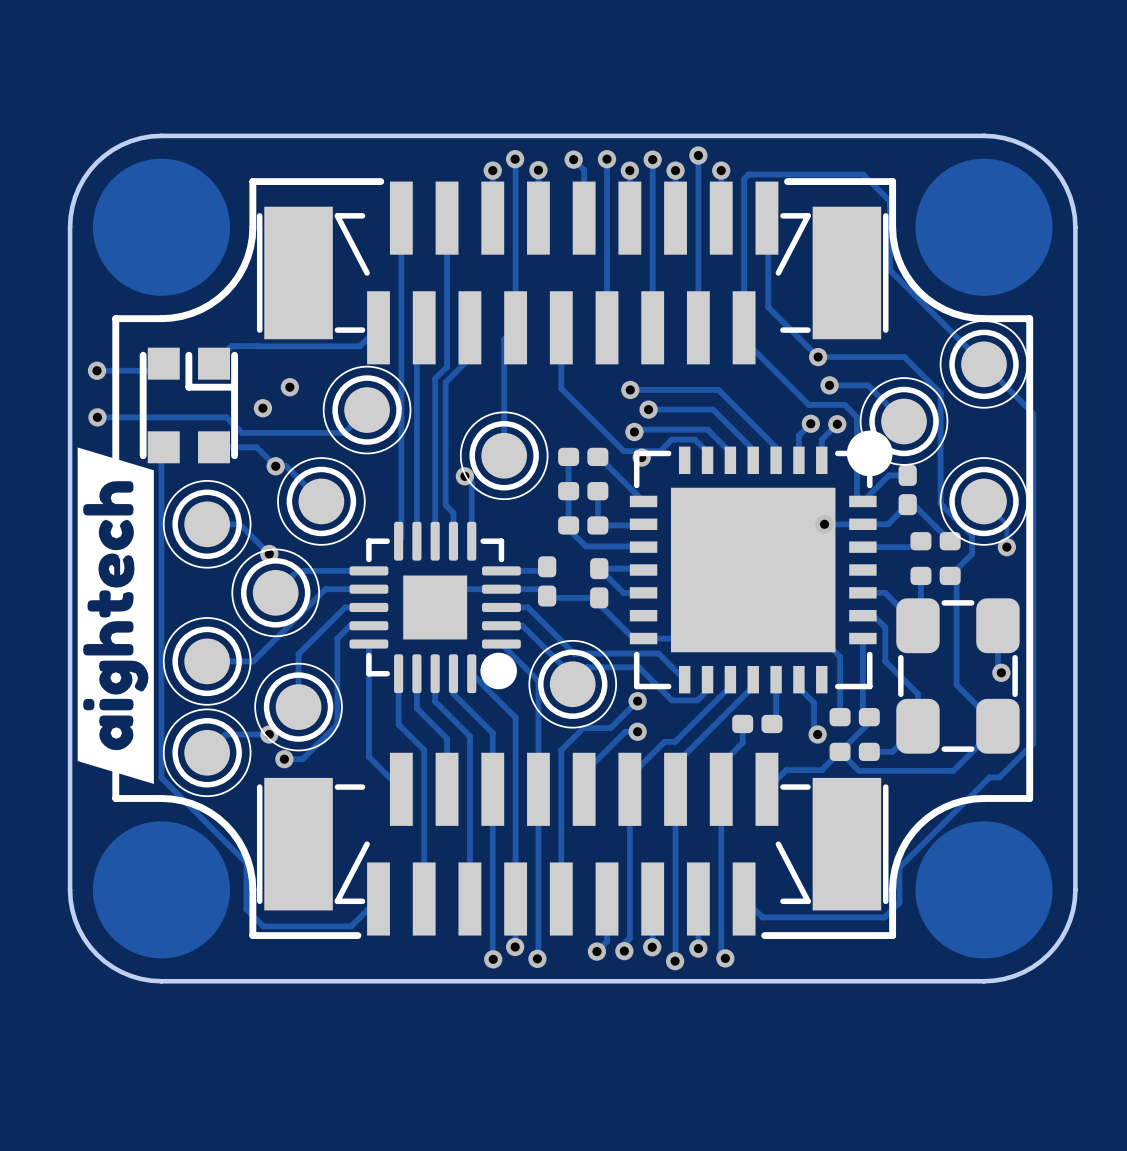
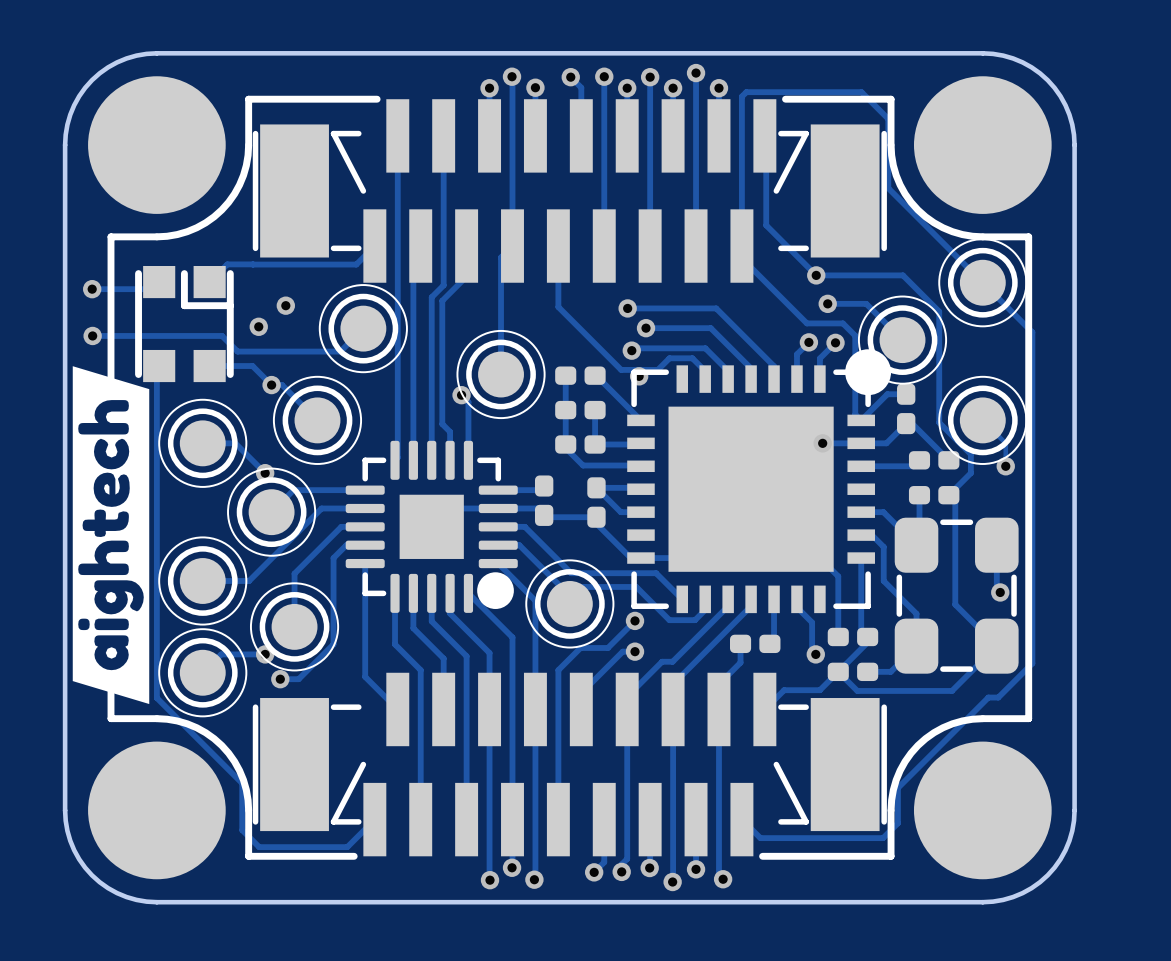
drawing: [92, 158, 231, 296] -> none
drawing: [915, 158, 1053, 296] -> none
part: none -> (156, 145)
part: none -> (982, 145)
drawing: [92, 821, 231, 959] -> none
drawing: [915, 821, 1053, 959] -> none
part: none -> (156, 810)
part: none -> (982, 810)

